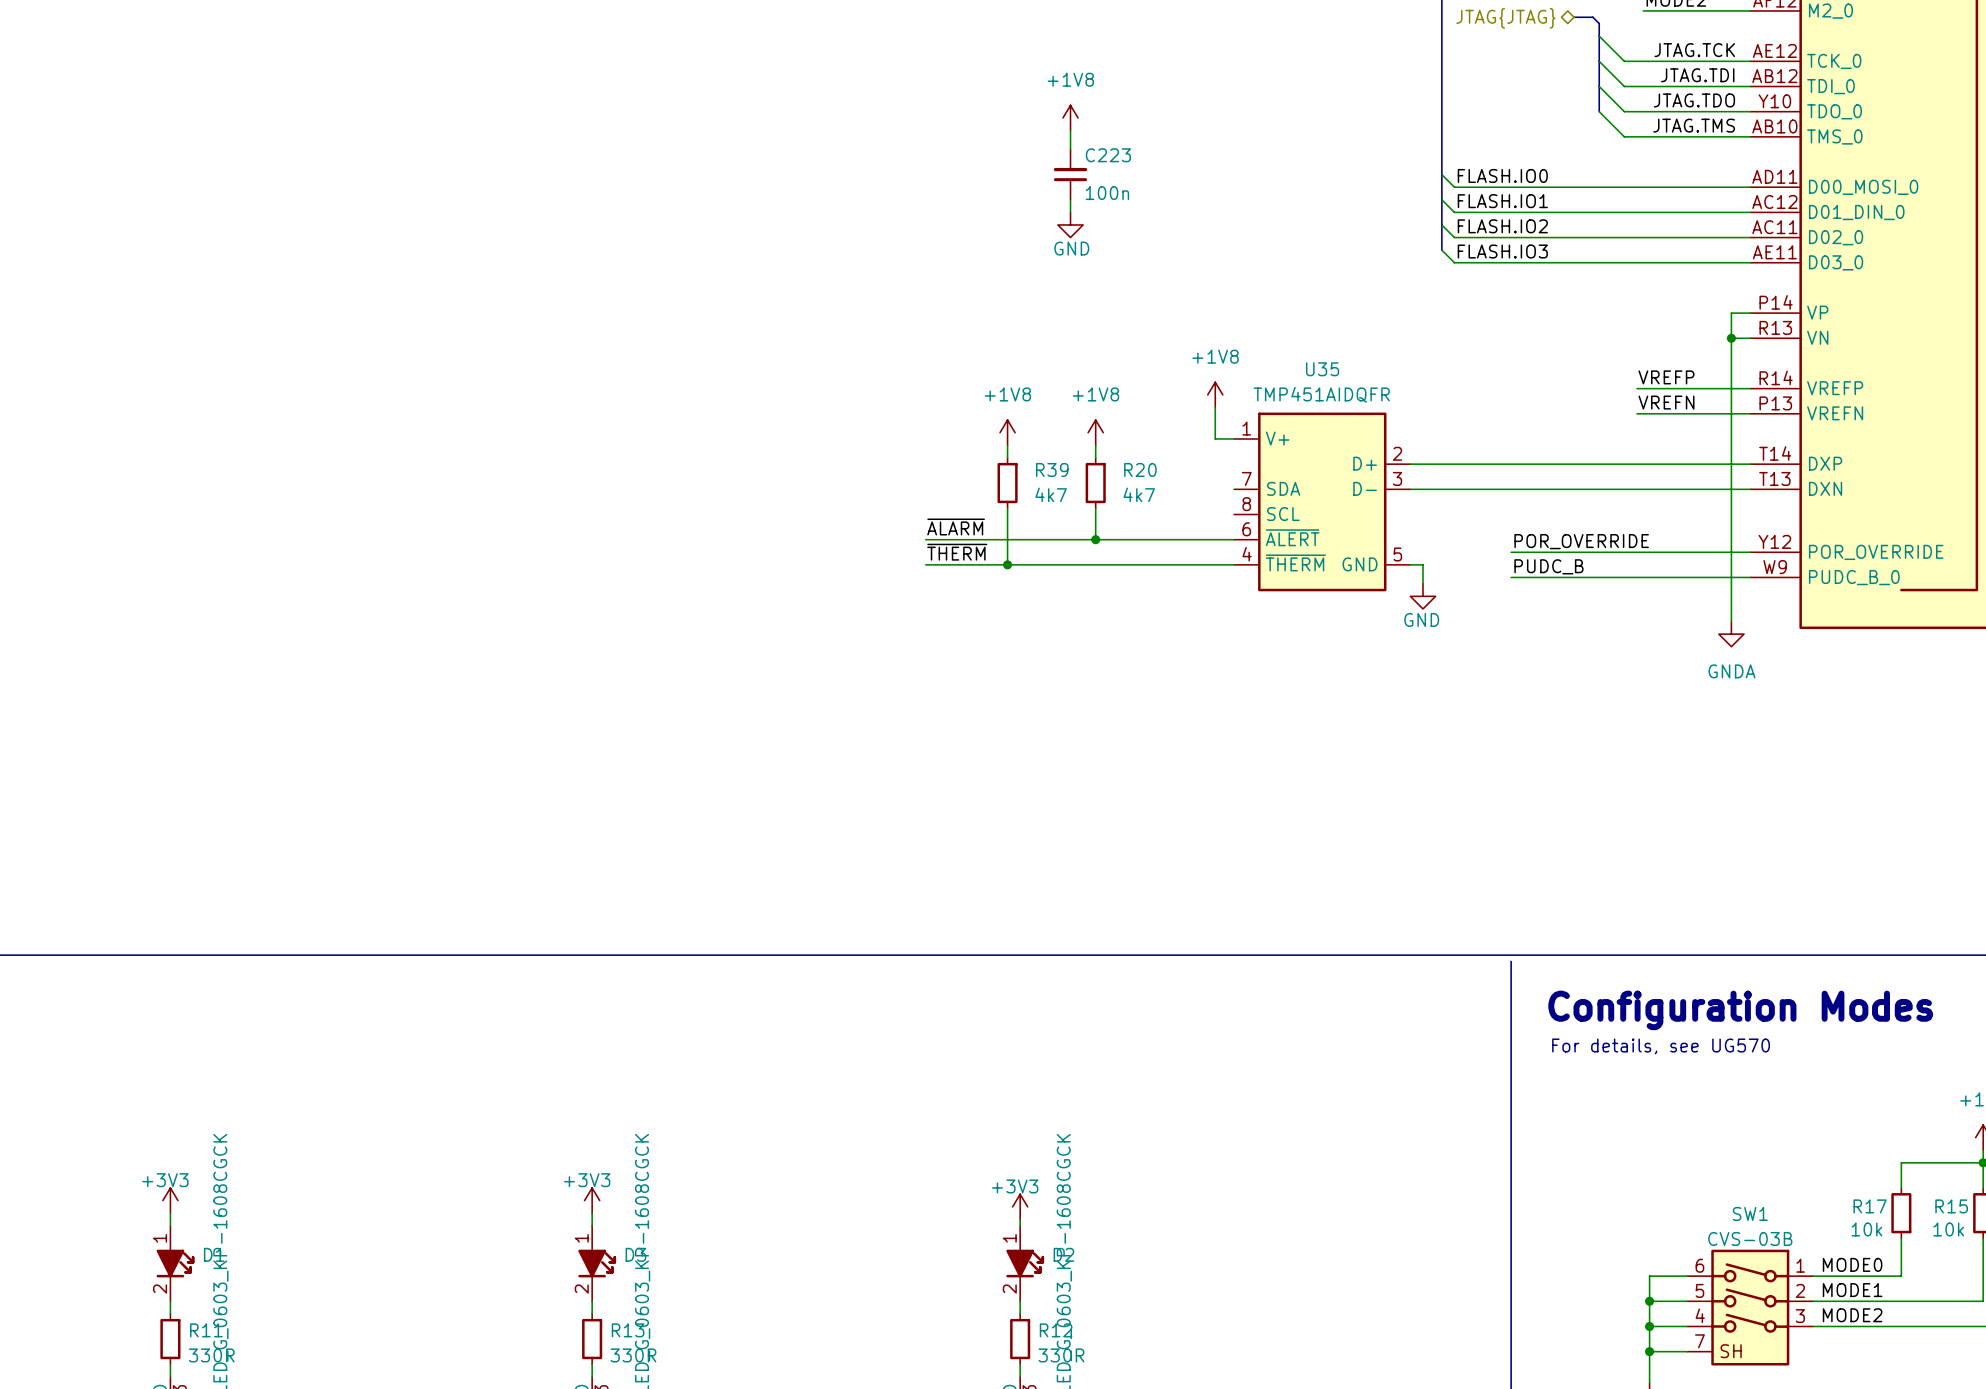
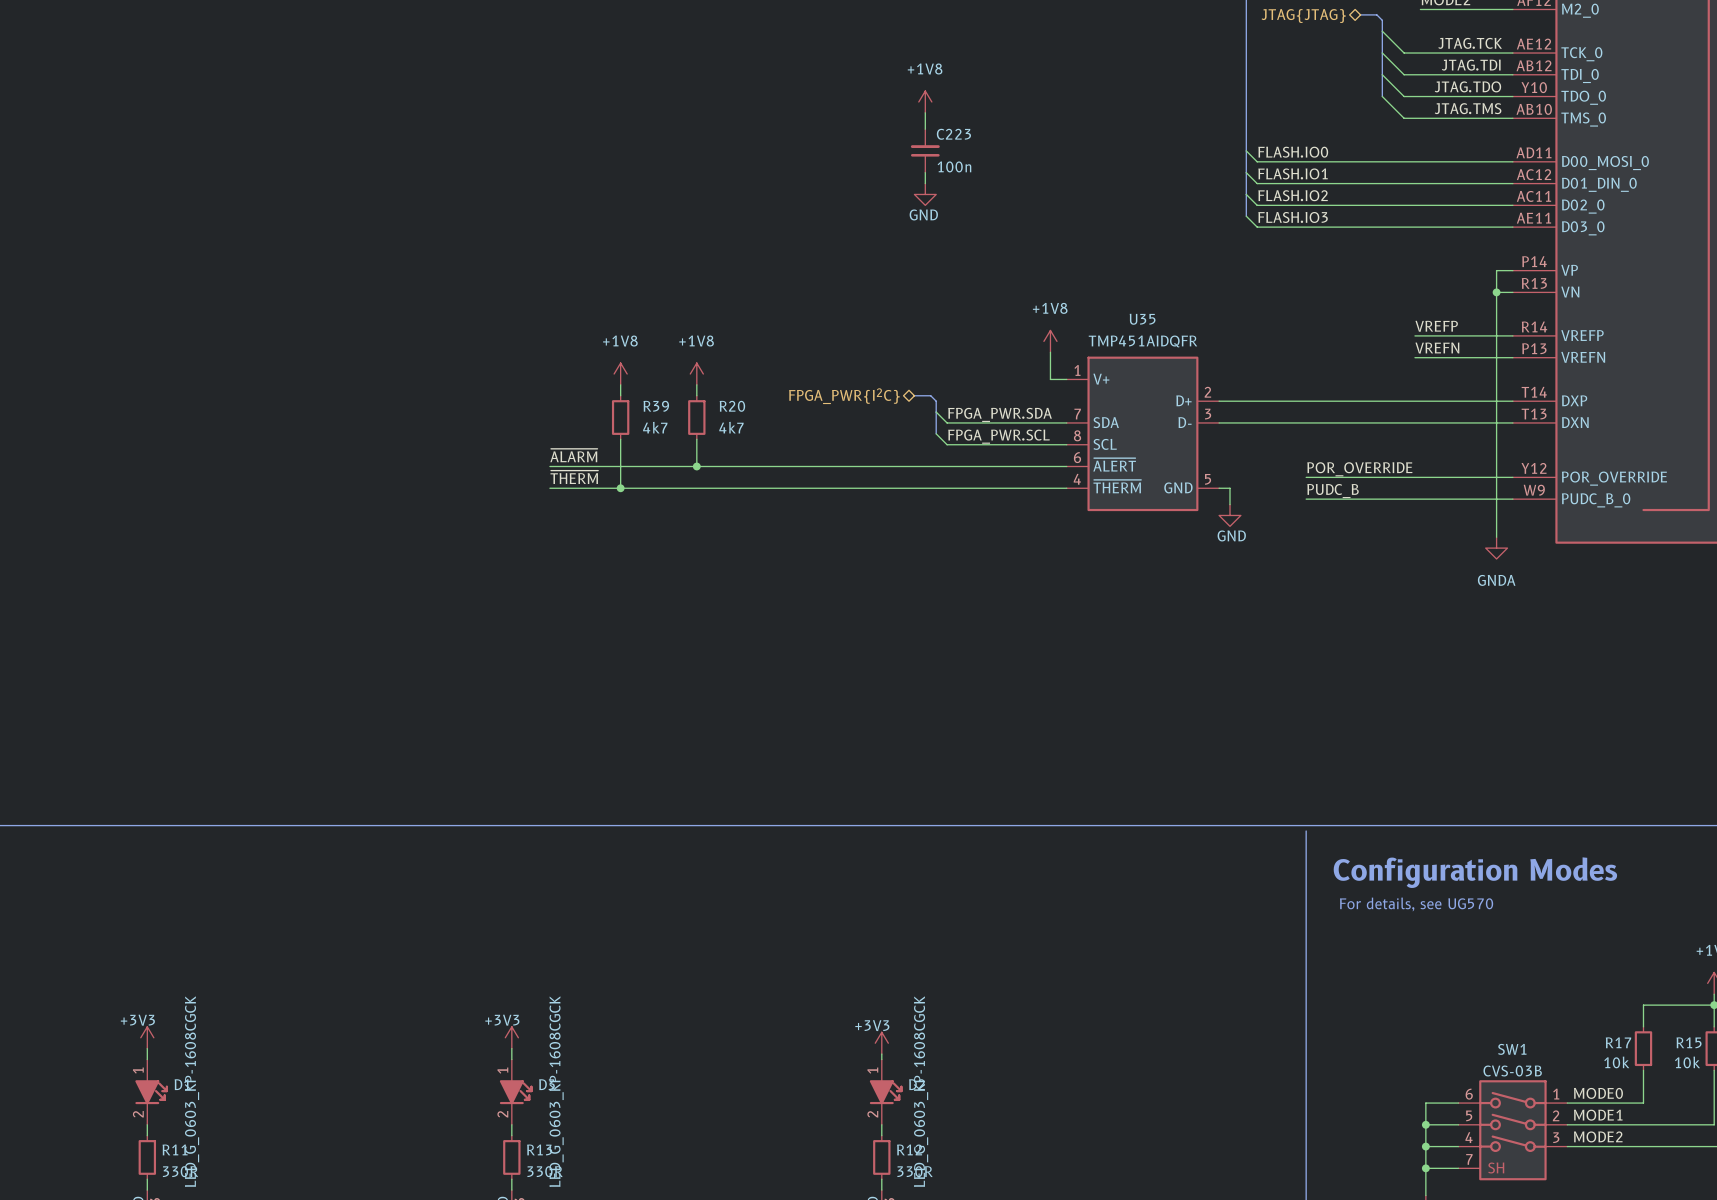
power symbol: none -> +1V8 (620, 374)
power symbol: none -> +1V8 (696, 374)
power symbol: +1V8 (1007, 432) -> none
power symbol: +1V8 (1095, 432) -> none
wire: none -> (620, 384) (620, 395)
wire: (1007, 445) (1007, 457) -> (696, 384) (696, 395)
wire: (1095, 445) (1095, 457) -> none
bus: none -> (914, 395) (930, 395) (936, 401) (936, 433)
hierarchical label: none -> FPGA_PWR{I2C} (844, 396)
wire: none -> (936, 412) (947, 422) (1066, 422)
label: none -> FPGA_PWR.SDA (1000, 414)
R39 position: (1007, 483) -> (620, 417)
R20 position: (1095, 483) -> (696, 417)
wire: none -> (936, 433) (947, 444)
label: none -> FPGA_PWR.SCL (998, 436)
wire: none -> (620, 439) (620, 488)
wire: none -> (696, 439) (696, 466)
wire: (1007, 508) (1007, 564) -> none
wire: (1095, 508) (1095, 539) -> none
wire: none -> (947, 444) (1066, 444)
label: none -> ~{ALARM} (573, 455)
label: ~{ALARM} (956, 527) -> none
wire: none -> (549, 466) (800, 466)
junction: none -> (696, 466)
junction: (1095, 539) -> none
label: none -> ~{THERM} (574, 477)
label: ~{THERM} (957, 552) -> none
wire: none -> (549, 488) (800, 488)
junction: none -> (620, 488)
junction: (1007, 564) -> none

